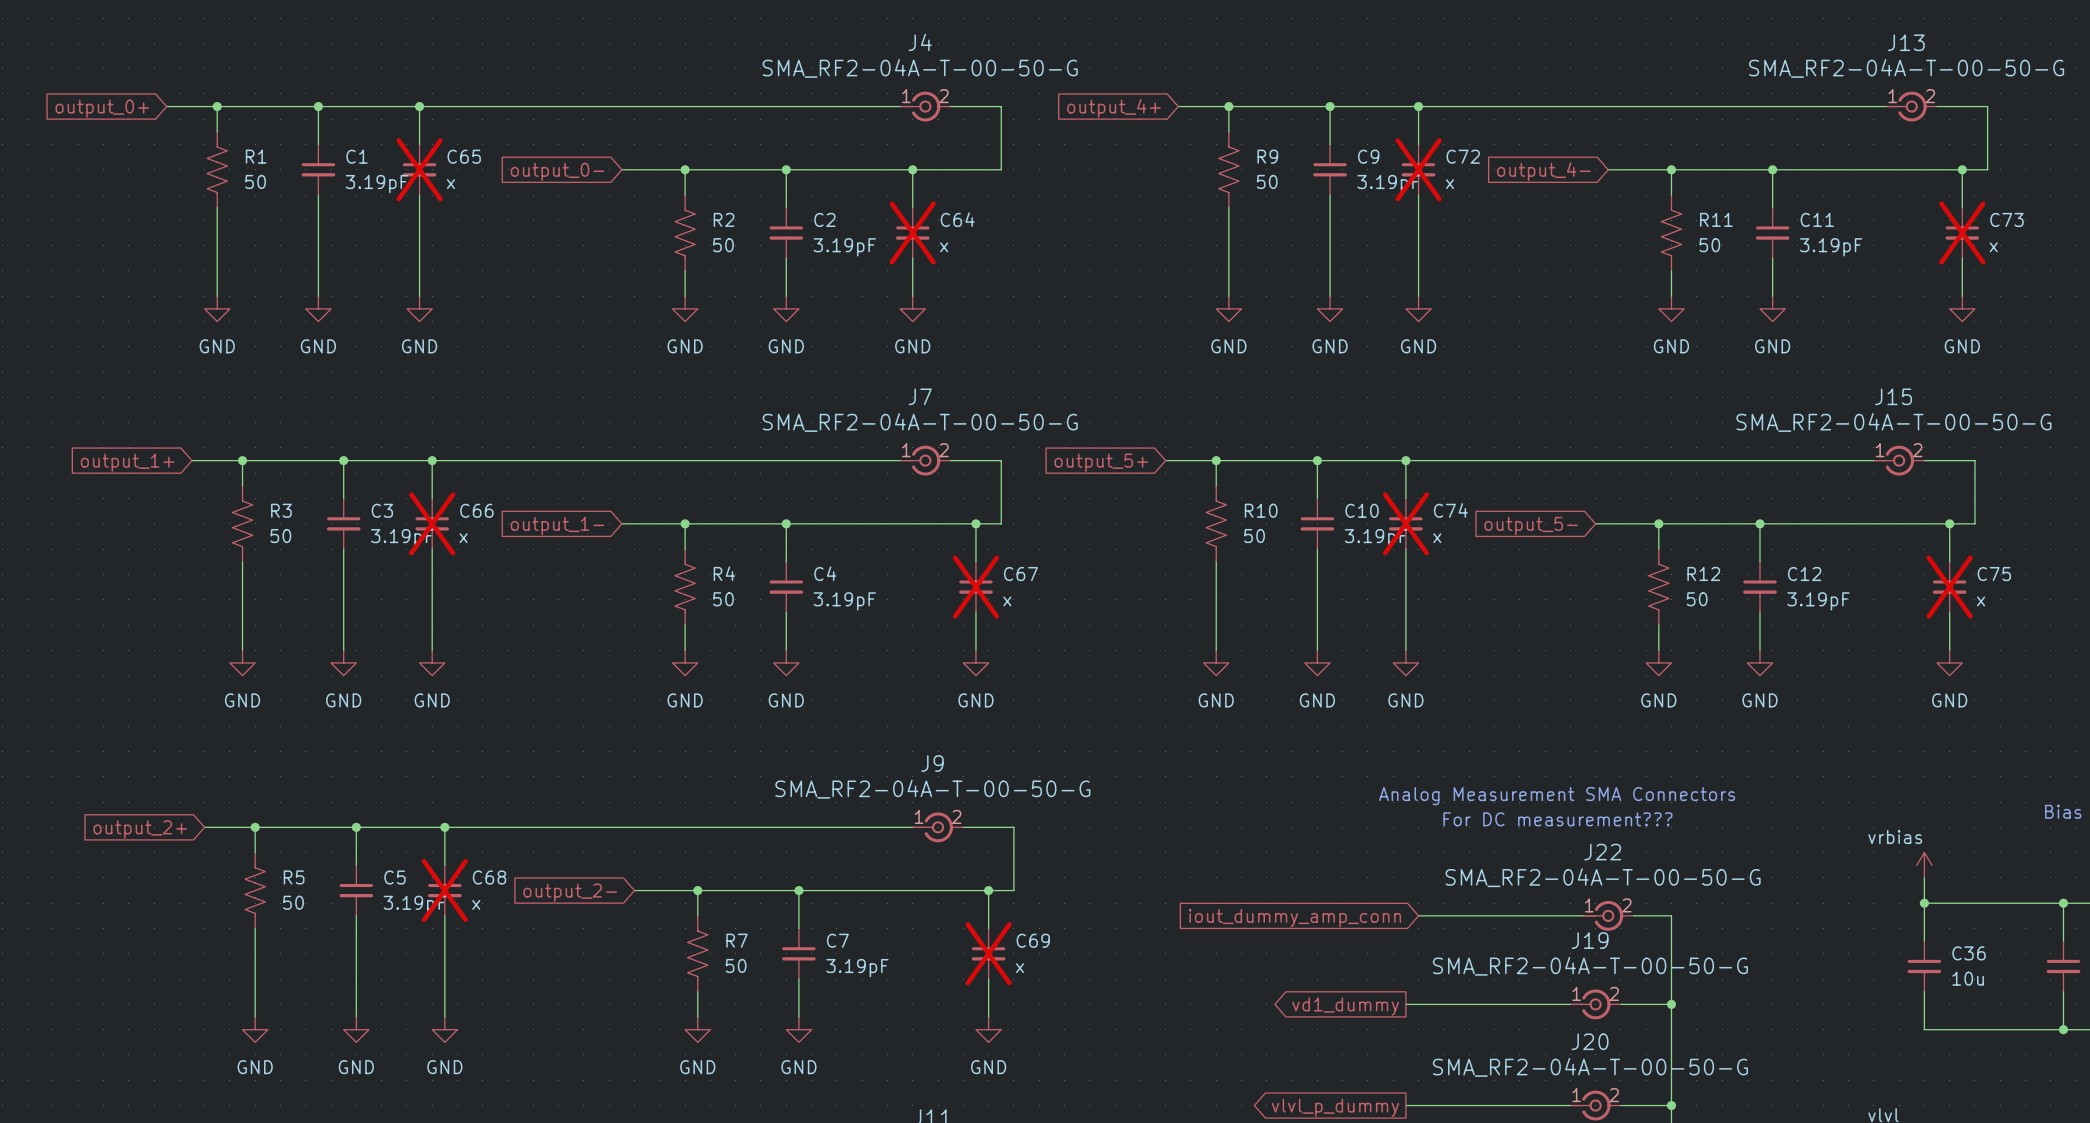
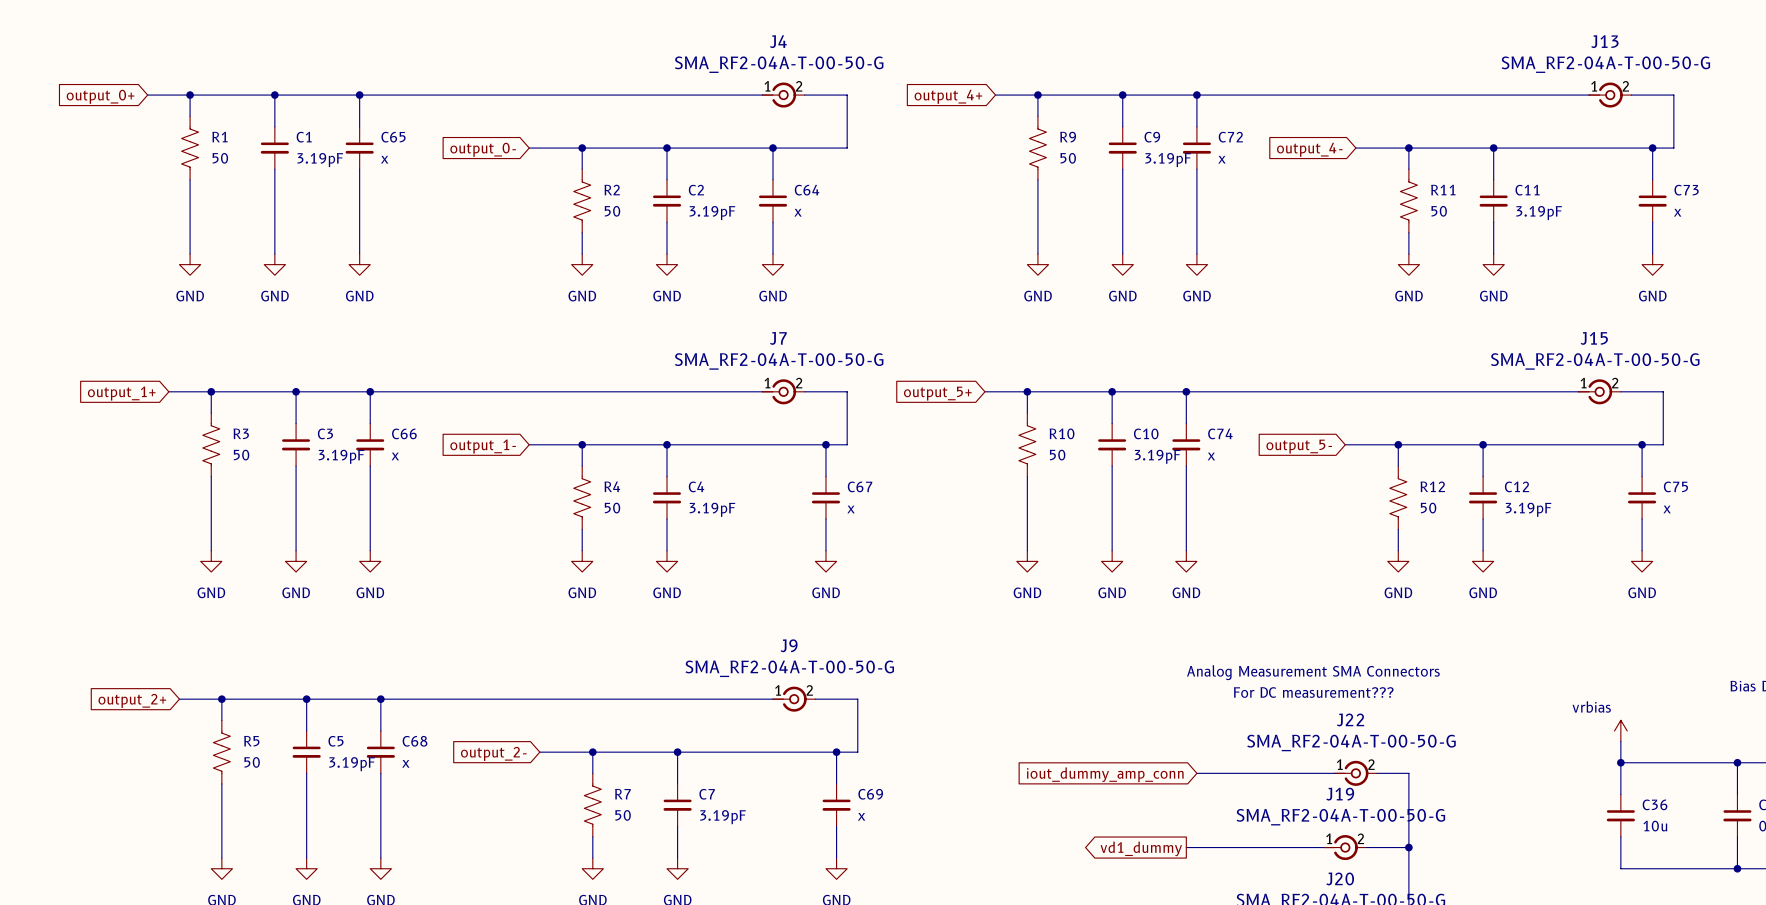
C65 do-not-place cross: (419, 169) -> none
C72 do-not-place cross: (1418, 169) -> none
C64 do-not-place cross: (912, 233) -> none
C73 do-not-place cross: (1962, 233) -> none
C66 do-not-place cross: (432, 523) -> none
C74 do-not-place cross: (1405, 523) -> none
C67 do-not-place cross: (975, 587) -> none
C75 do-not-place cross: (1949, 587) -> none
C68 do-not-place cross: (444, 890) -> none
C69 do-not-place cross: (988, 953) -> none

